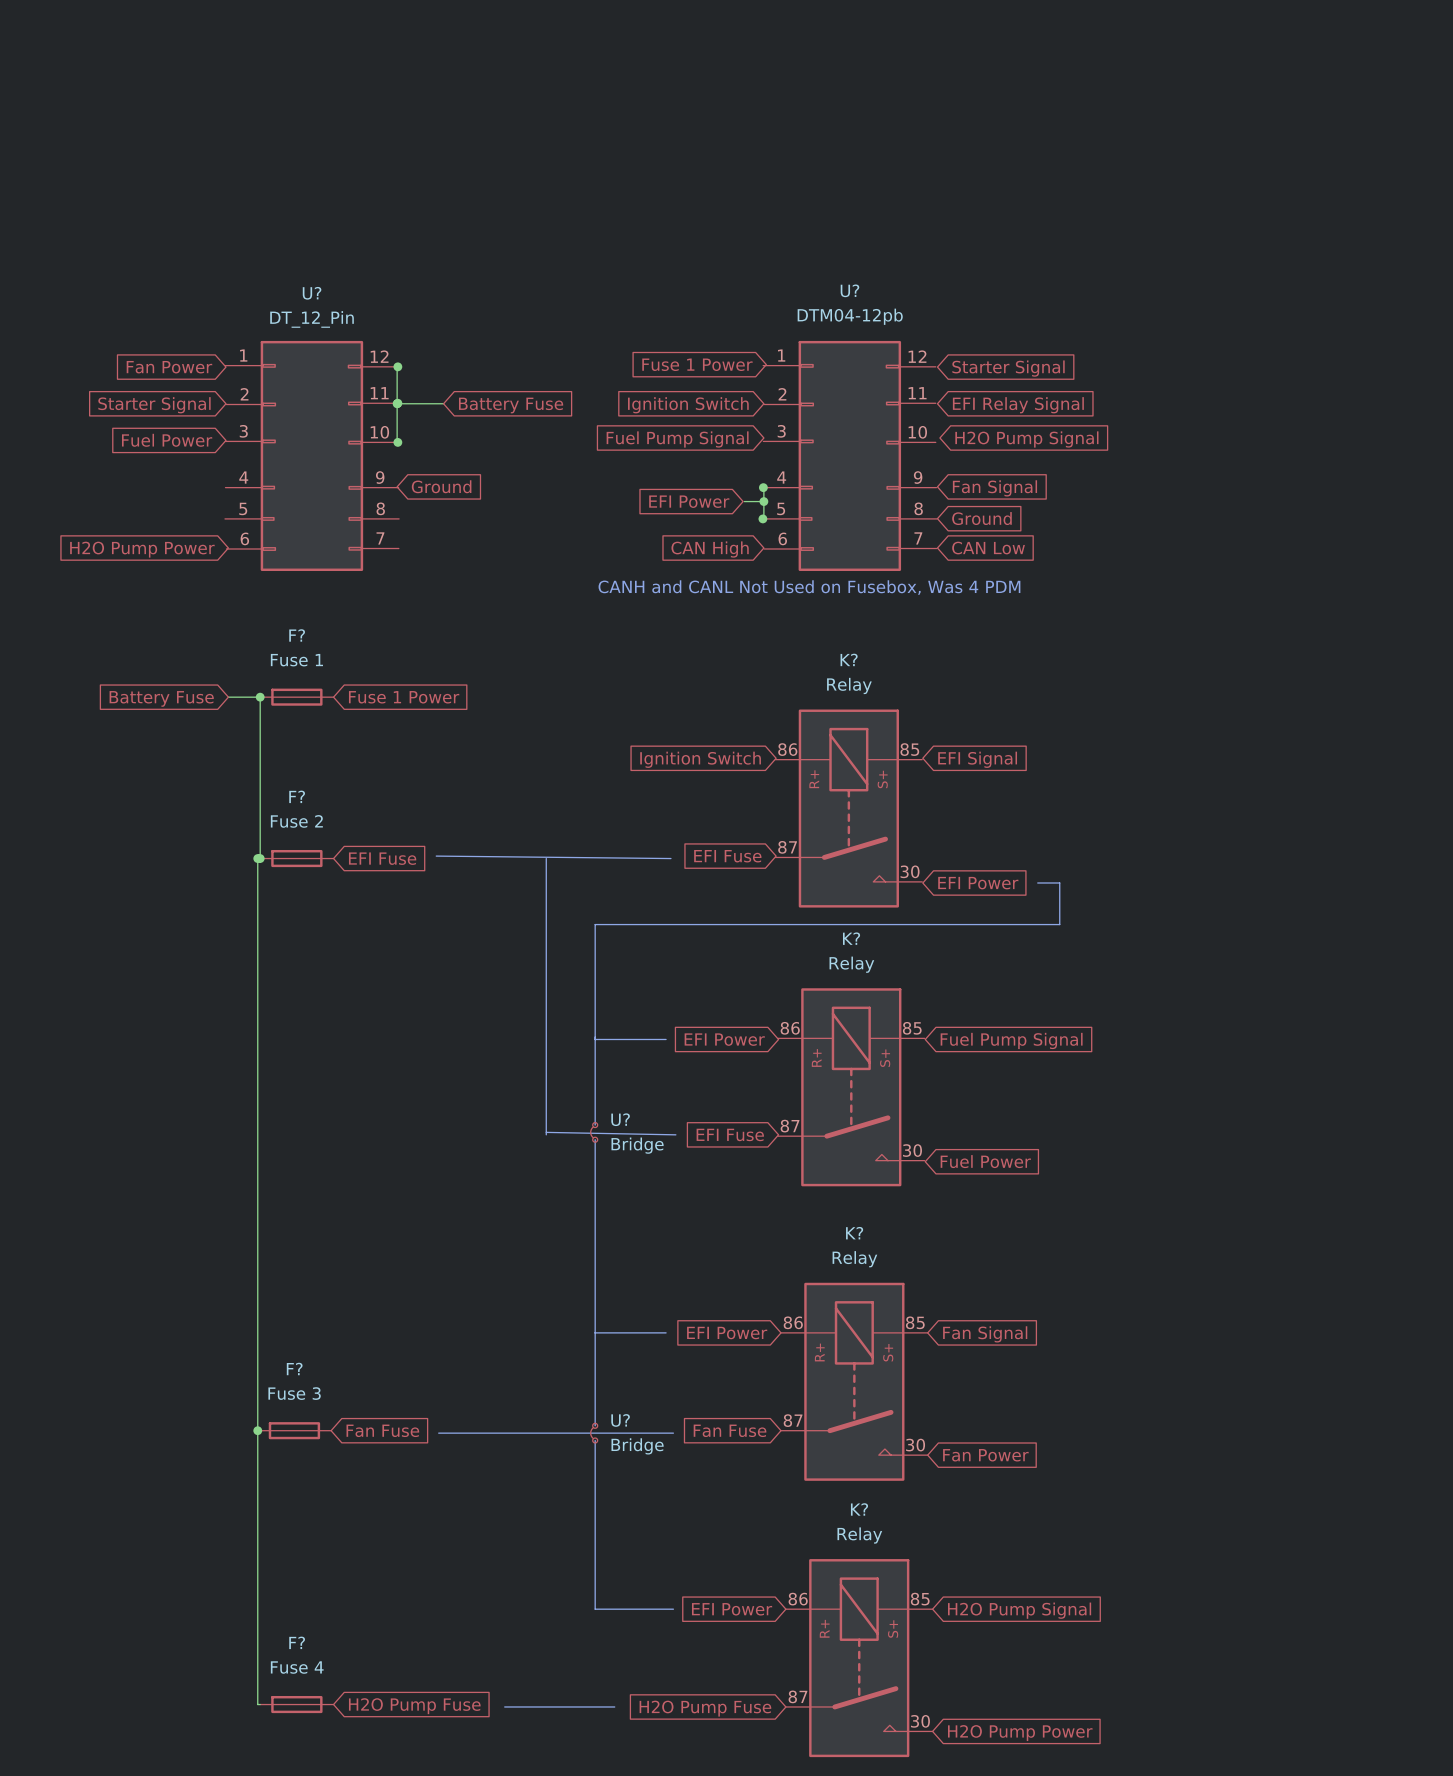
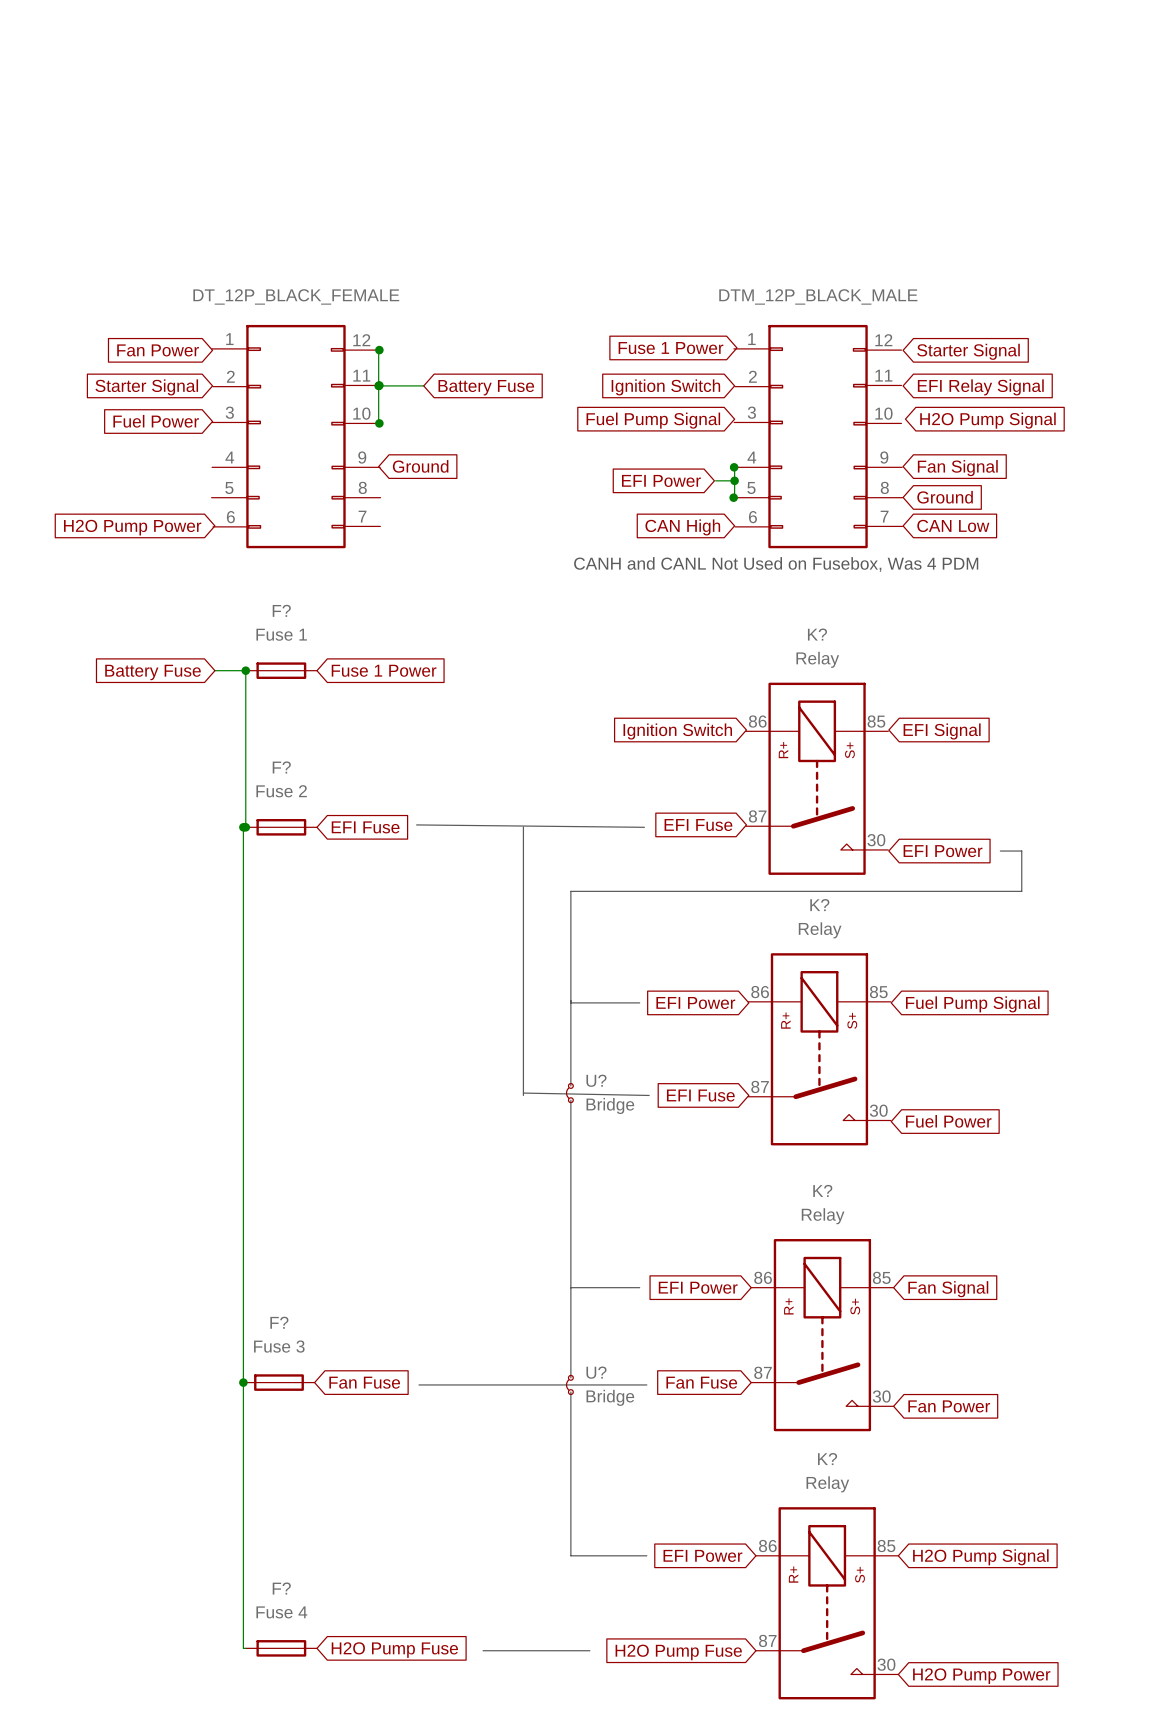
U? name: U? (849, 290) -> none
U? name: U? (312, 293) -> none
U? value: DTM04-12pb (850, 316) -> DTM_12P_BLACK_MALE (818, 296)
U? value: DT_12_Pin (312, 319) -> DT_12P_BLACK_FEMALE (296, 296)

